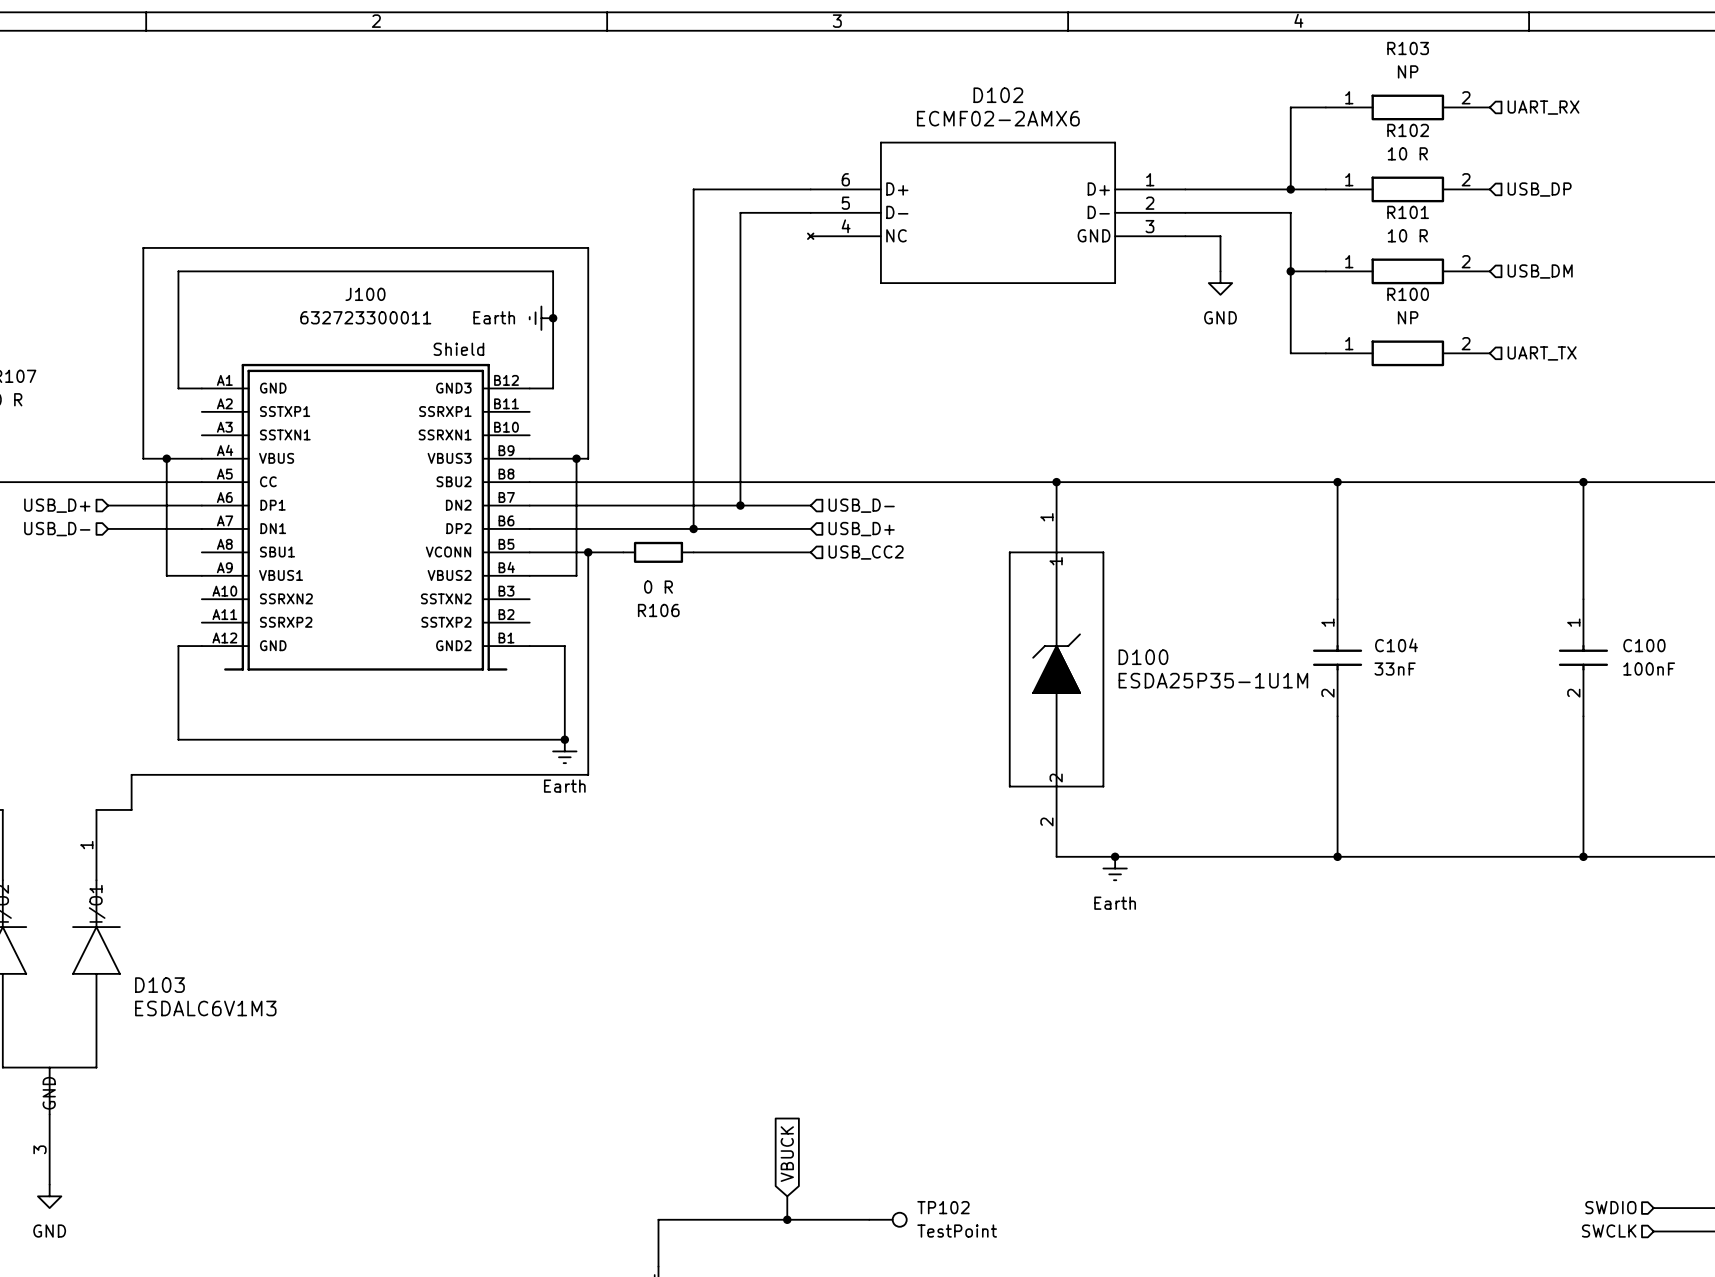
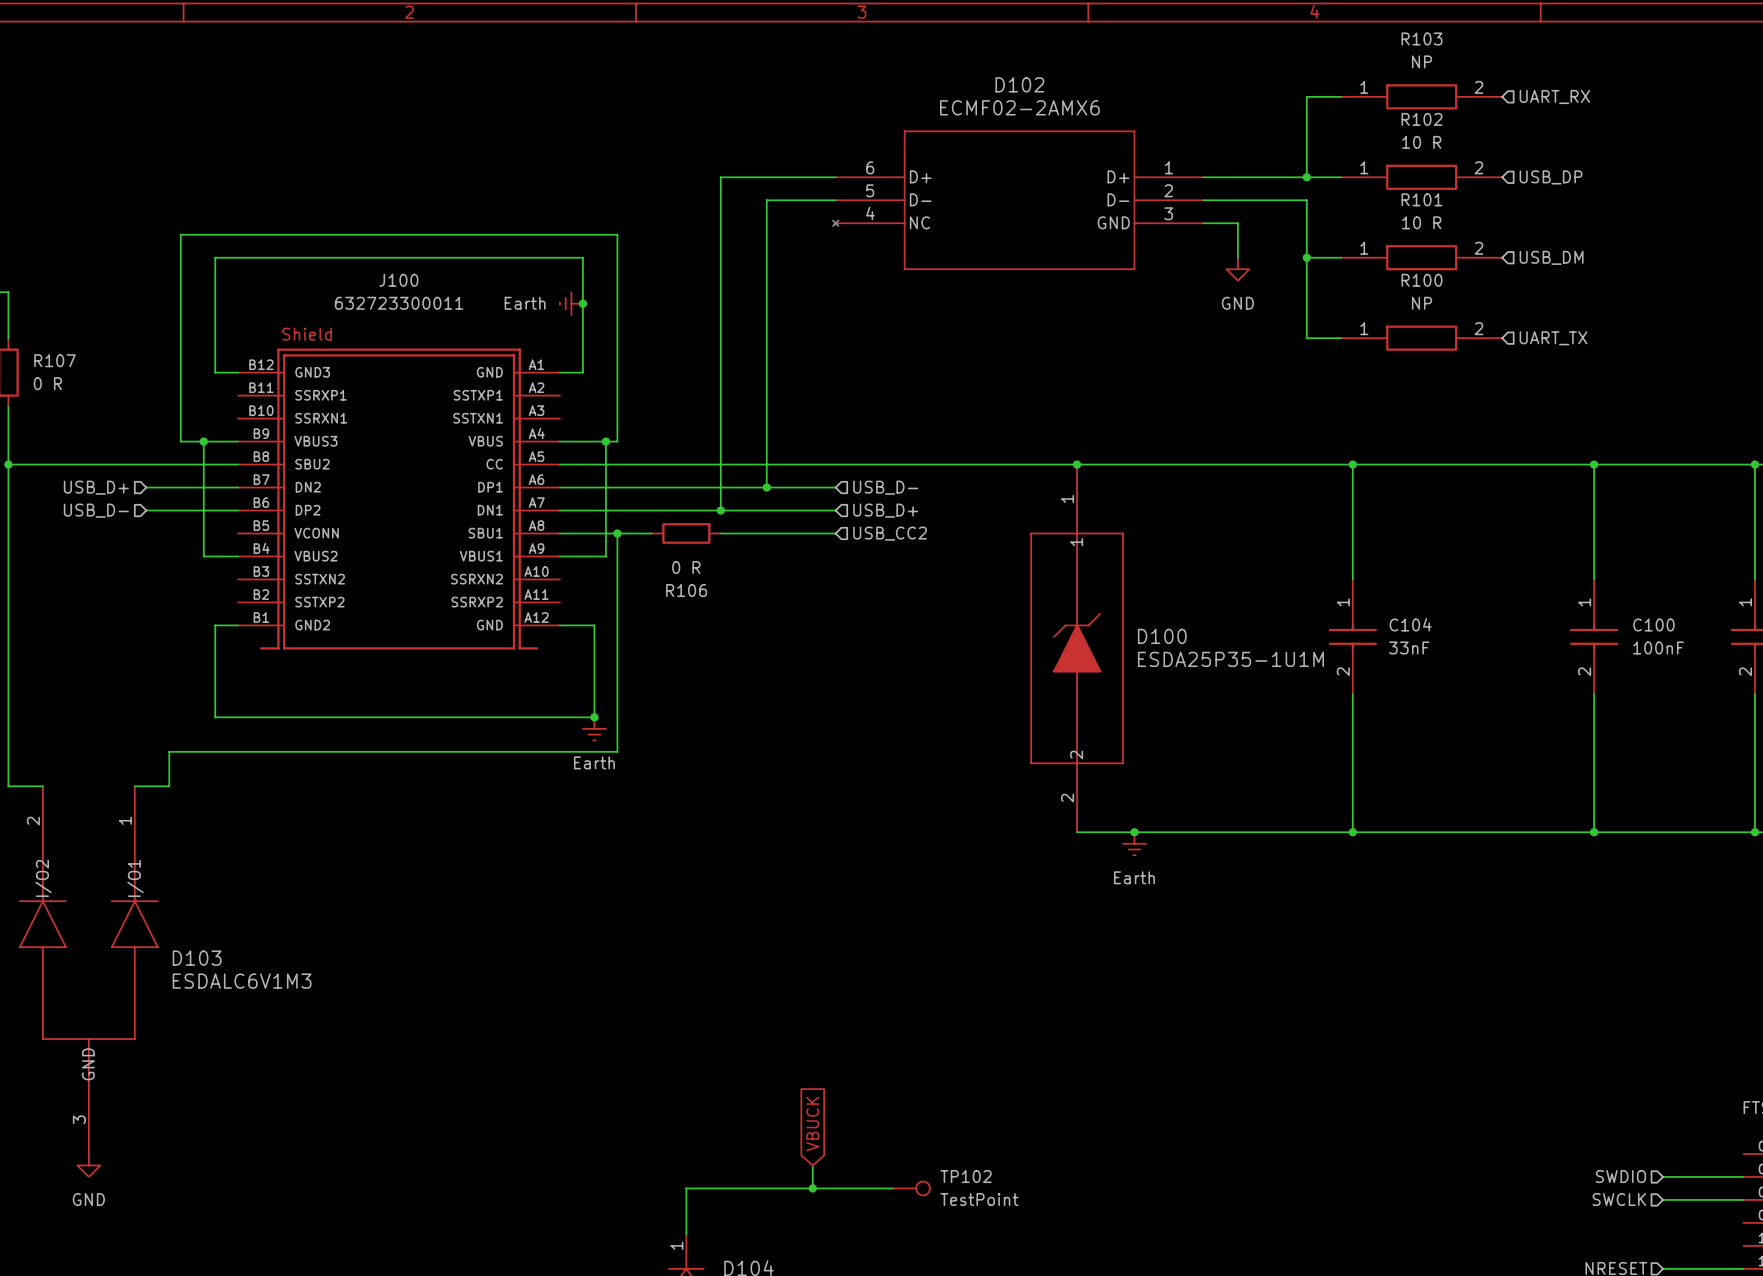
J100 flip: as is (365, 517) -> left-right (399, 499)

